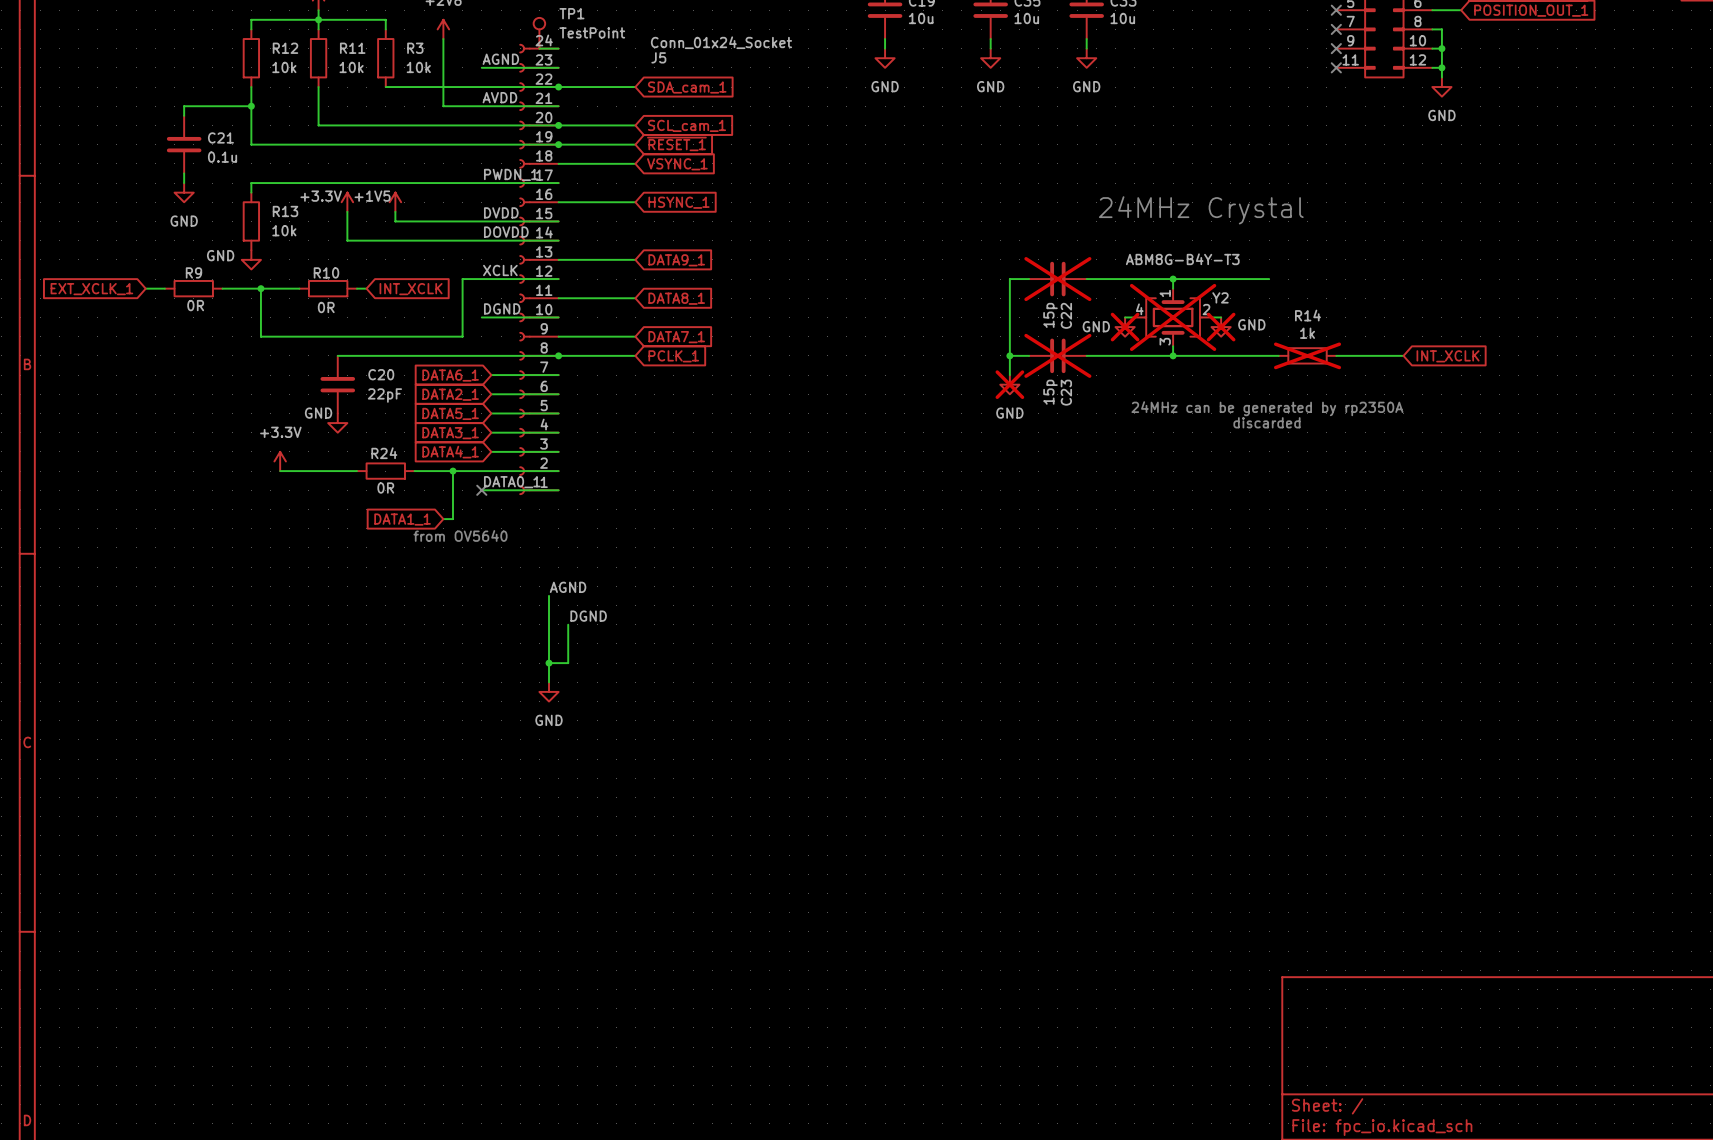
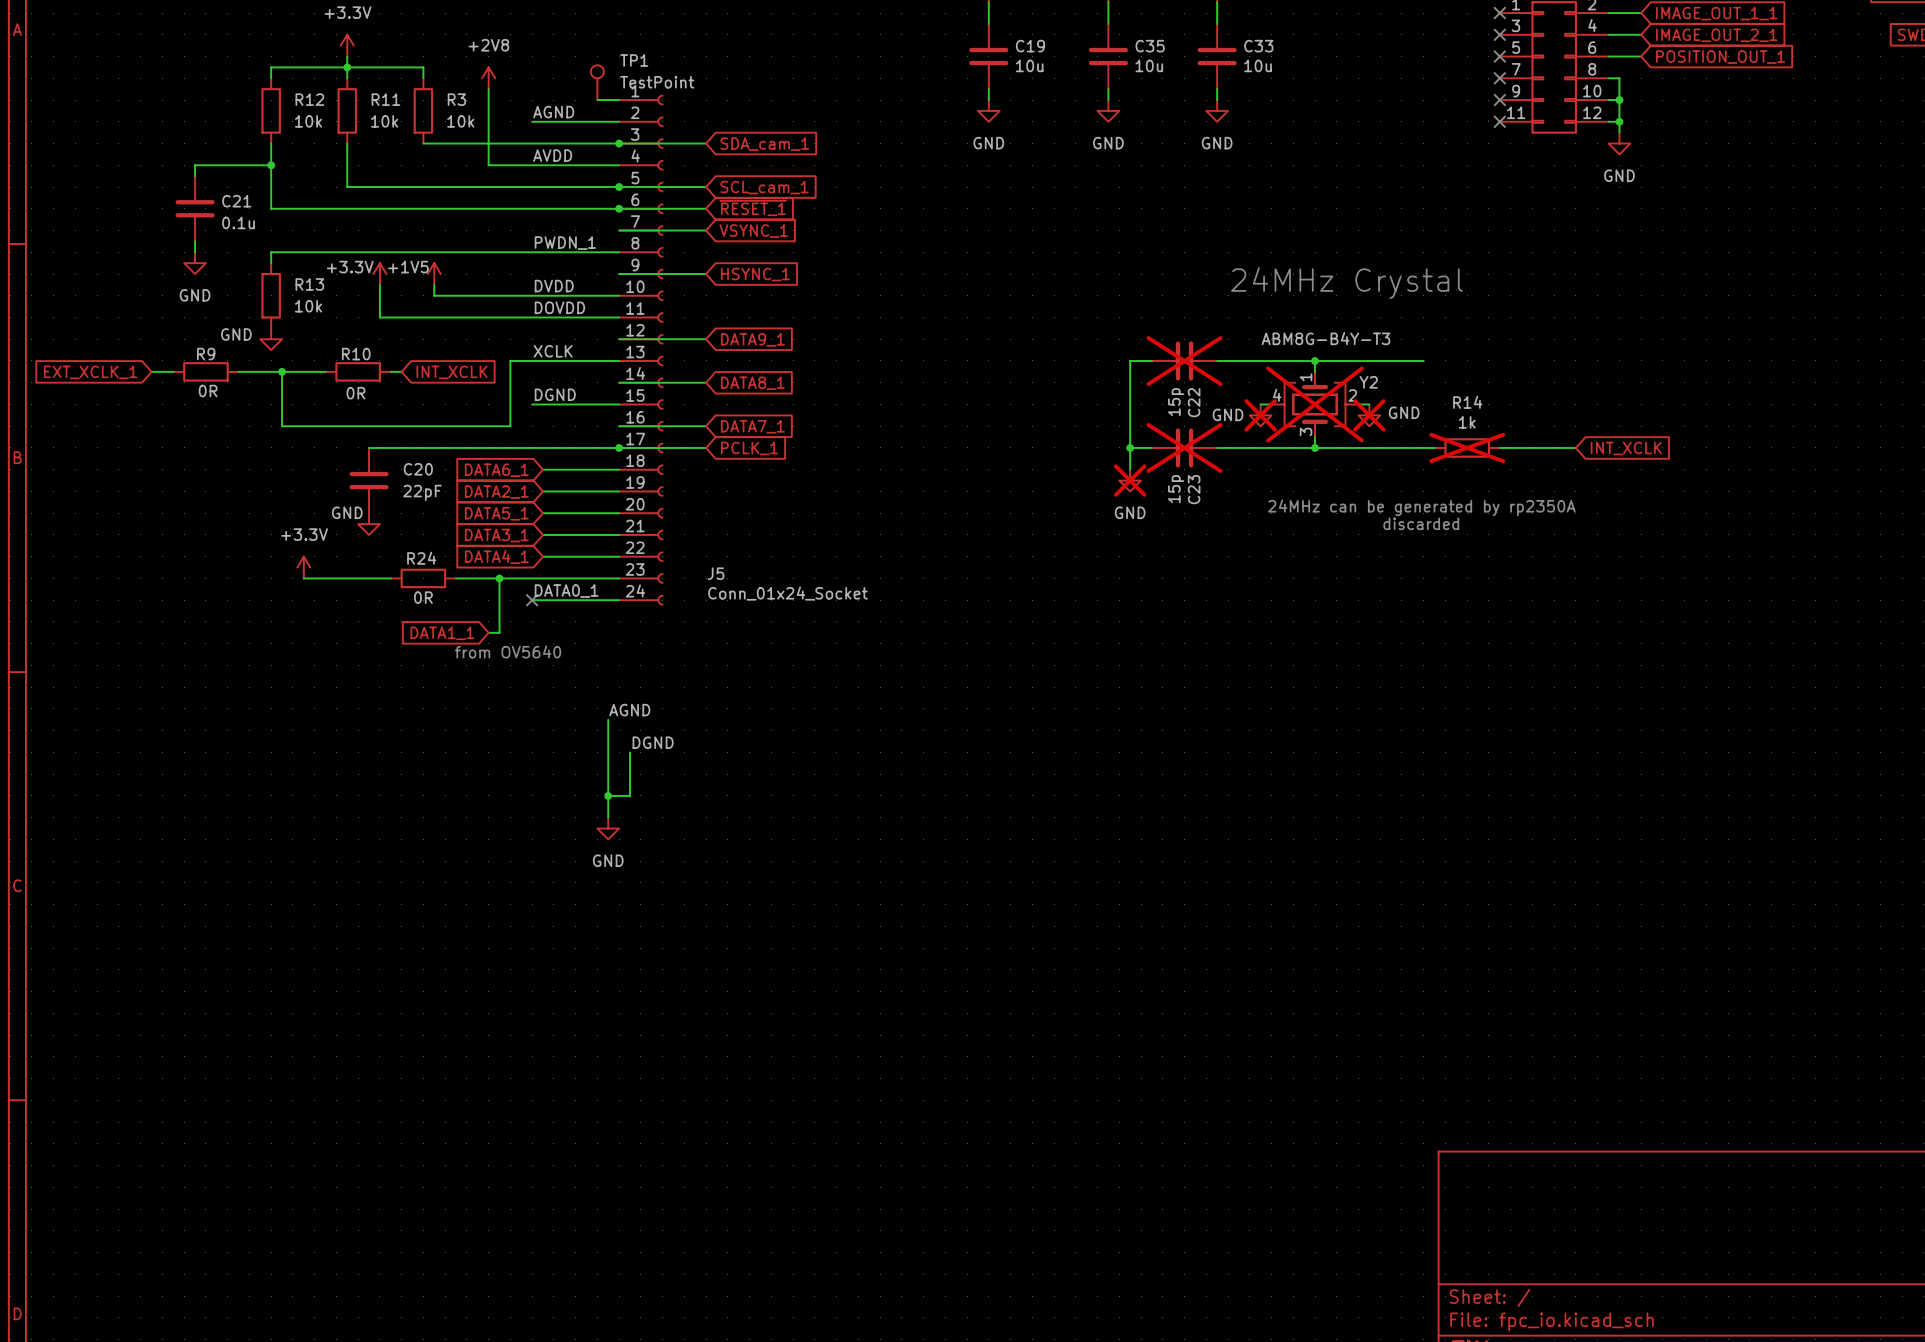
J5 value position: Conn_01x24_Socket (721, 42) -> Conn_01x24_Socket (787, 593)
J5 name position: J5 (658, 57) -> J5 (716, 573)
J5 rotation: 0° (525, 269) -> 180° (657, 350)

